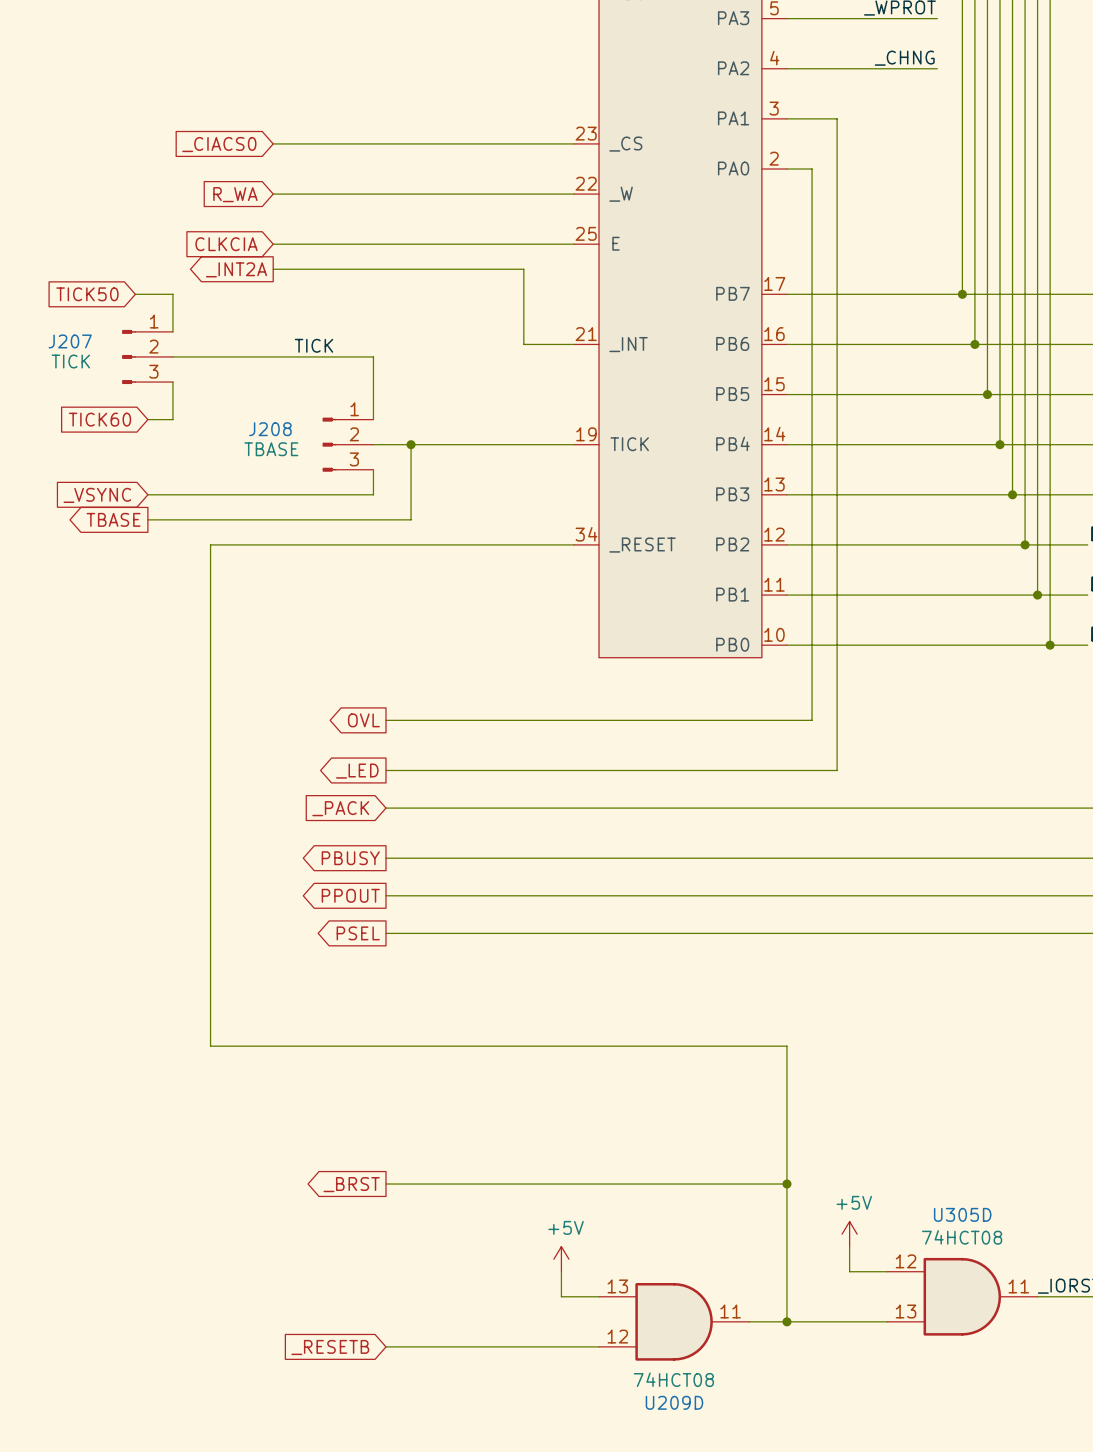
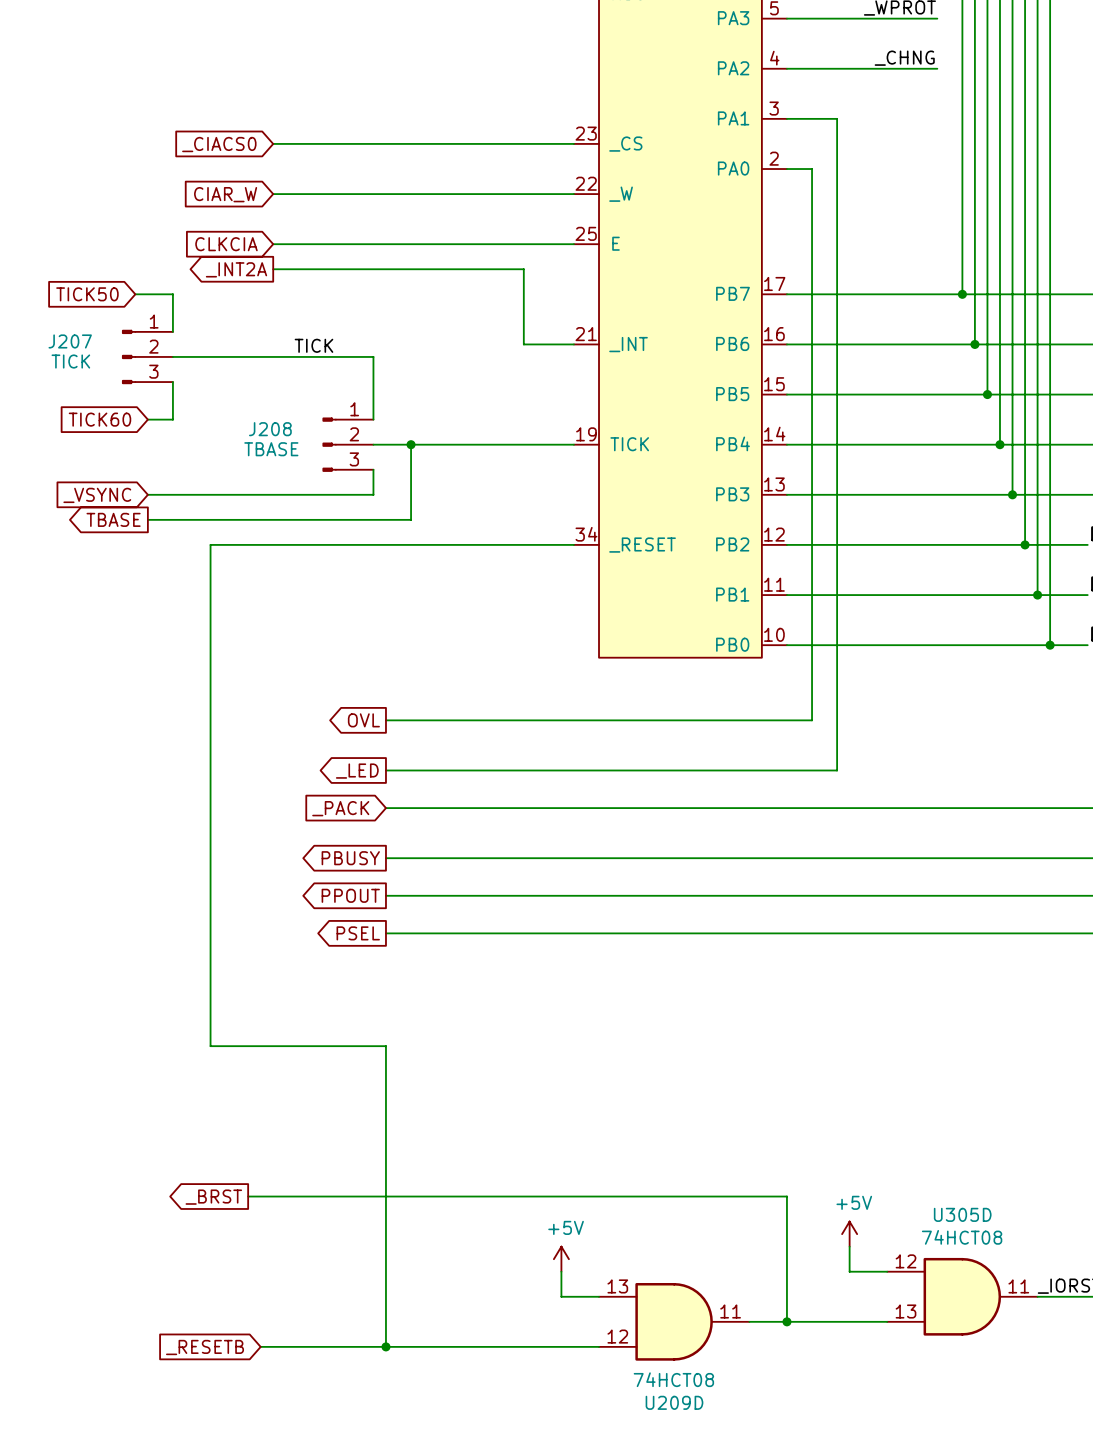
global label: R_WA (235, 194) -> CIAR_W (225, 194)
wire: (385, 1046) (786, 1046) (786, 1196) -> (248, 1196) (786, 1196)
wire: none -> (385, 1046) (385, 1346) (260, 1346)
global label position: _BRST (351, 1184) -> _BRST (213, 1197)
wire: (385, 1184) (786, 1184) -> none
junction: (786, 1184) -> none
junction: none -> (385, 1346)
global label position: _RESETB (330, 1347) -> _RESETB (205, 1347)

